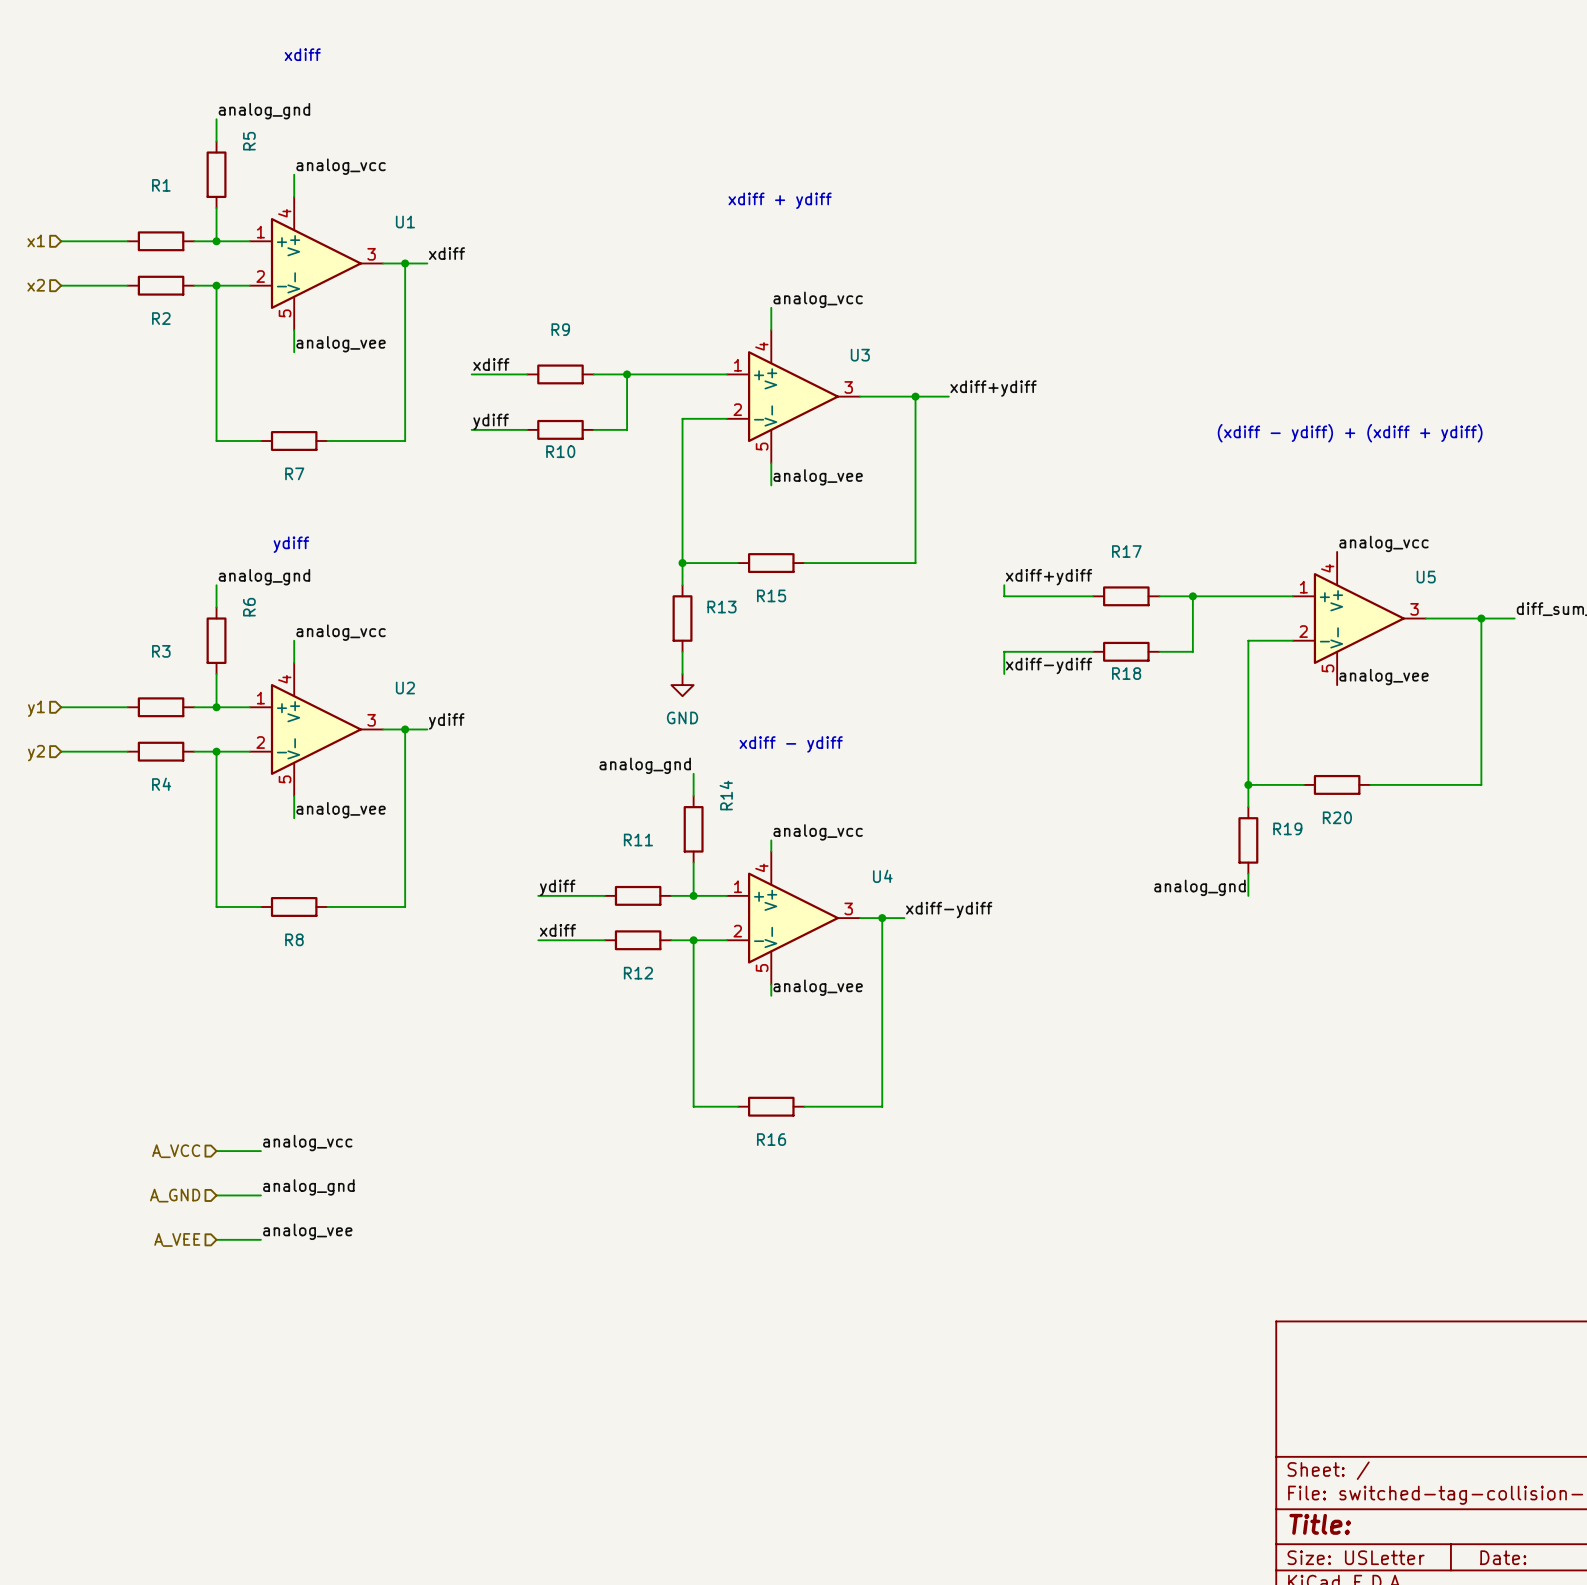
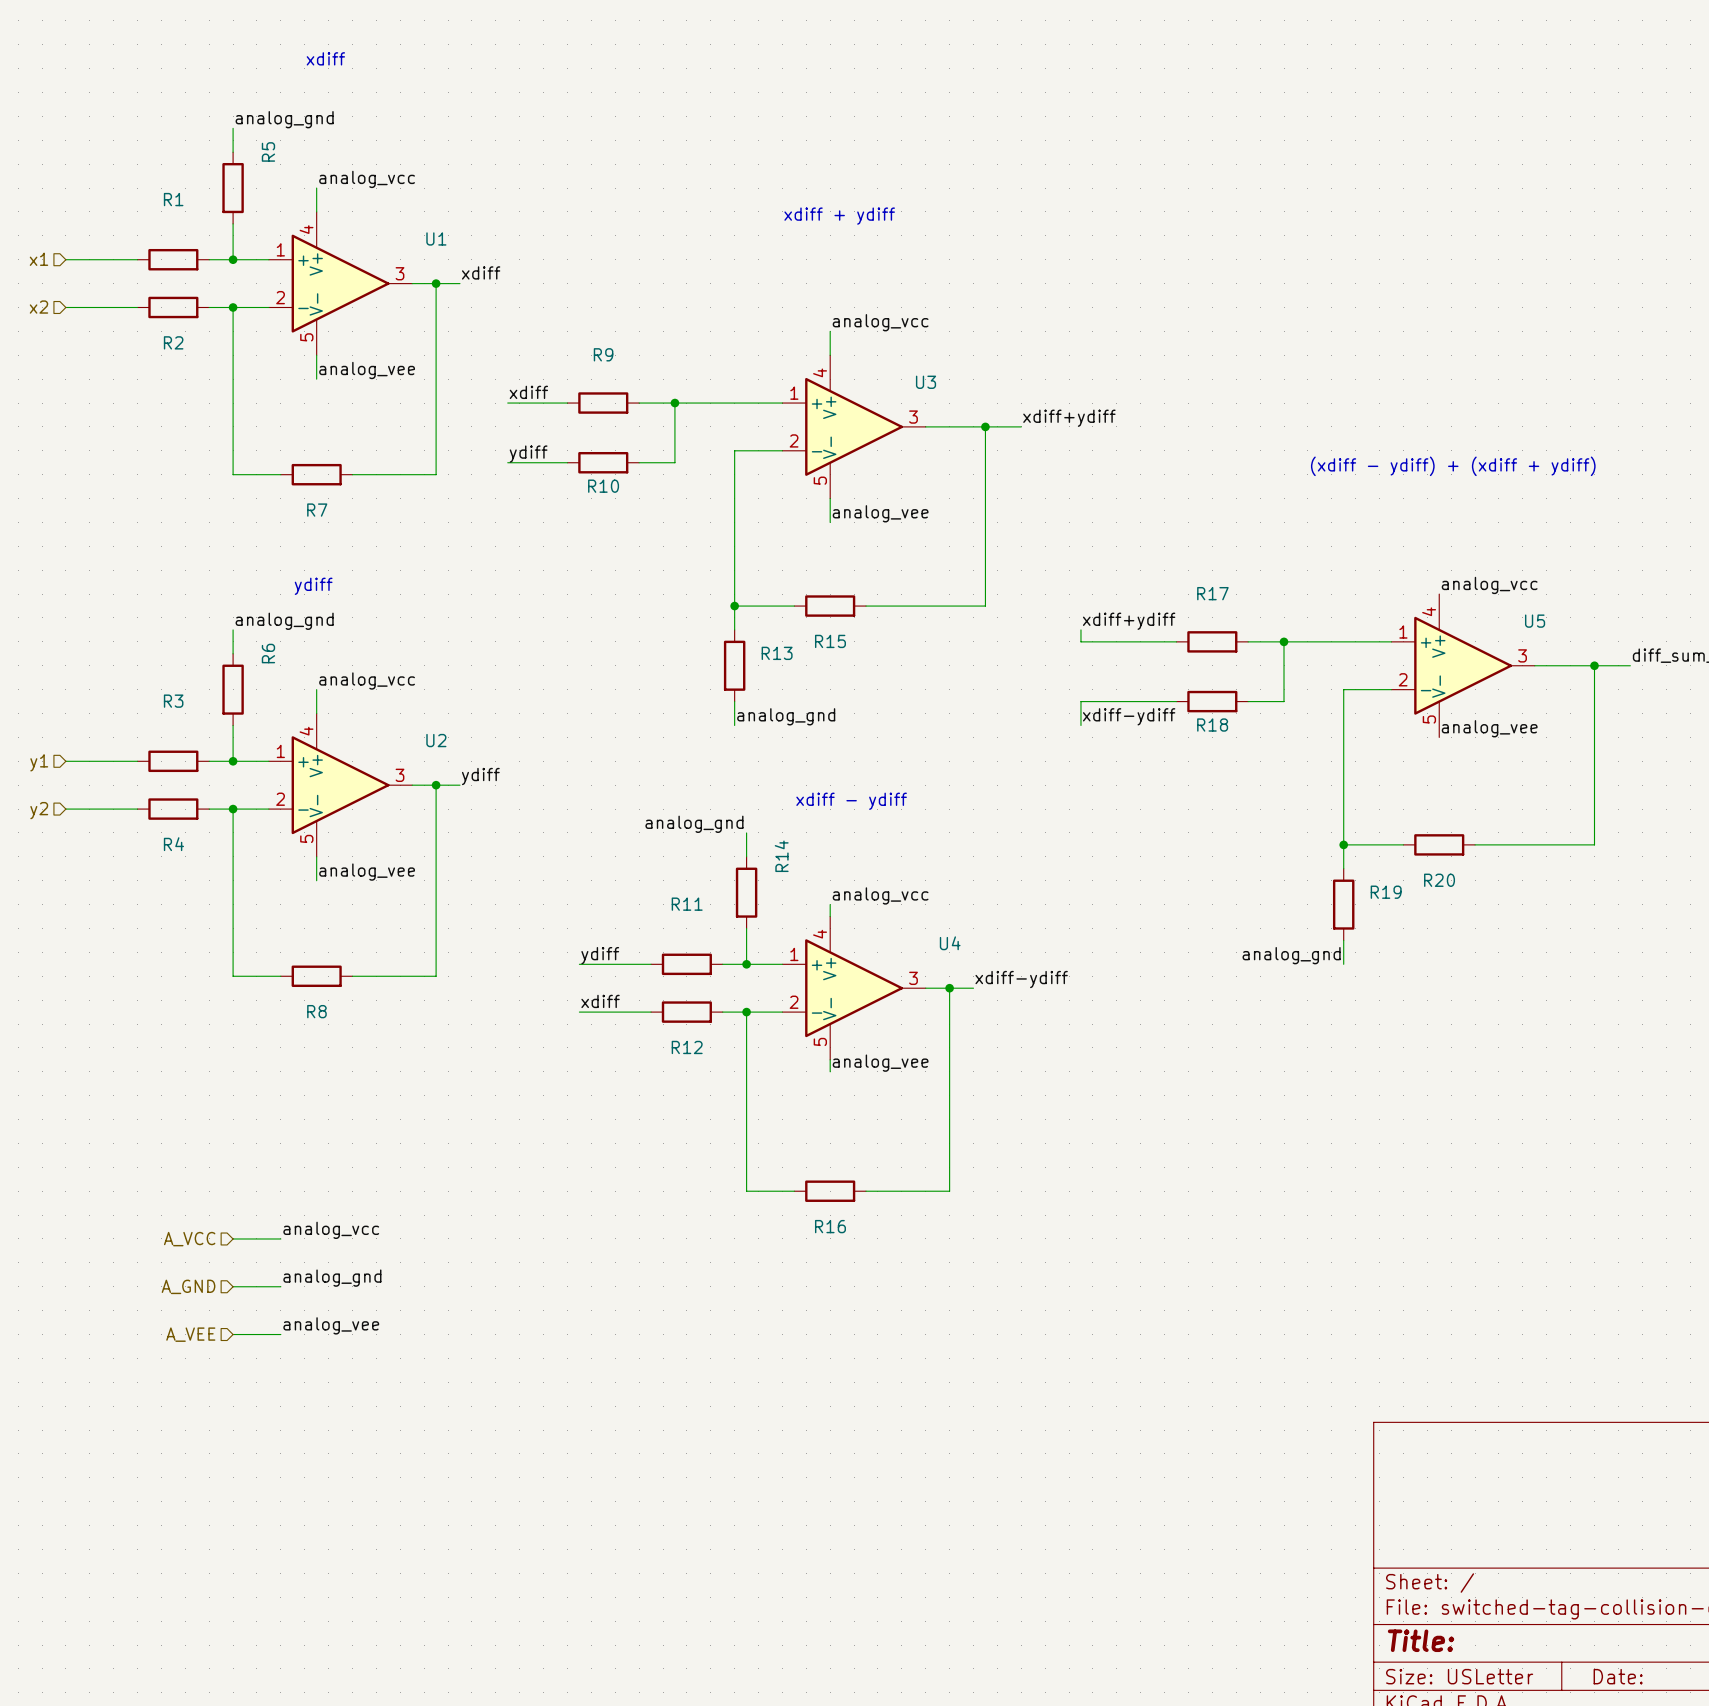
label: none -> analog_gnd (786, 716)
power symbol: GND (682, 685) -> none

